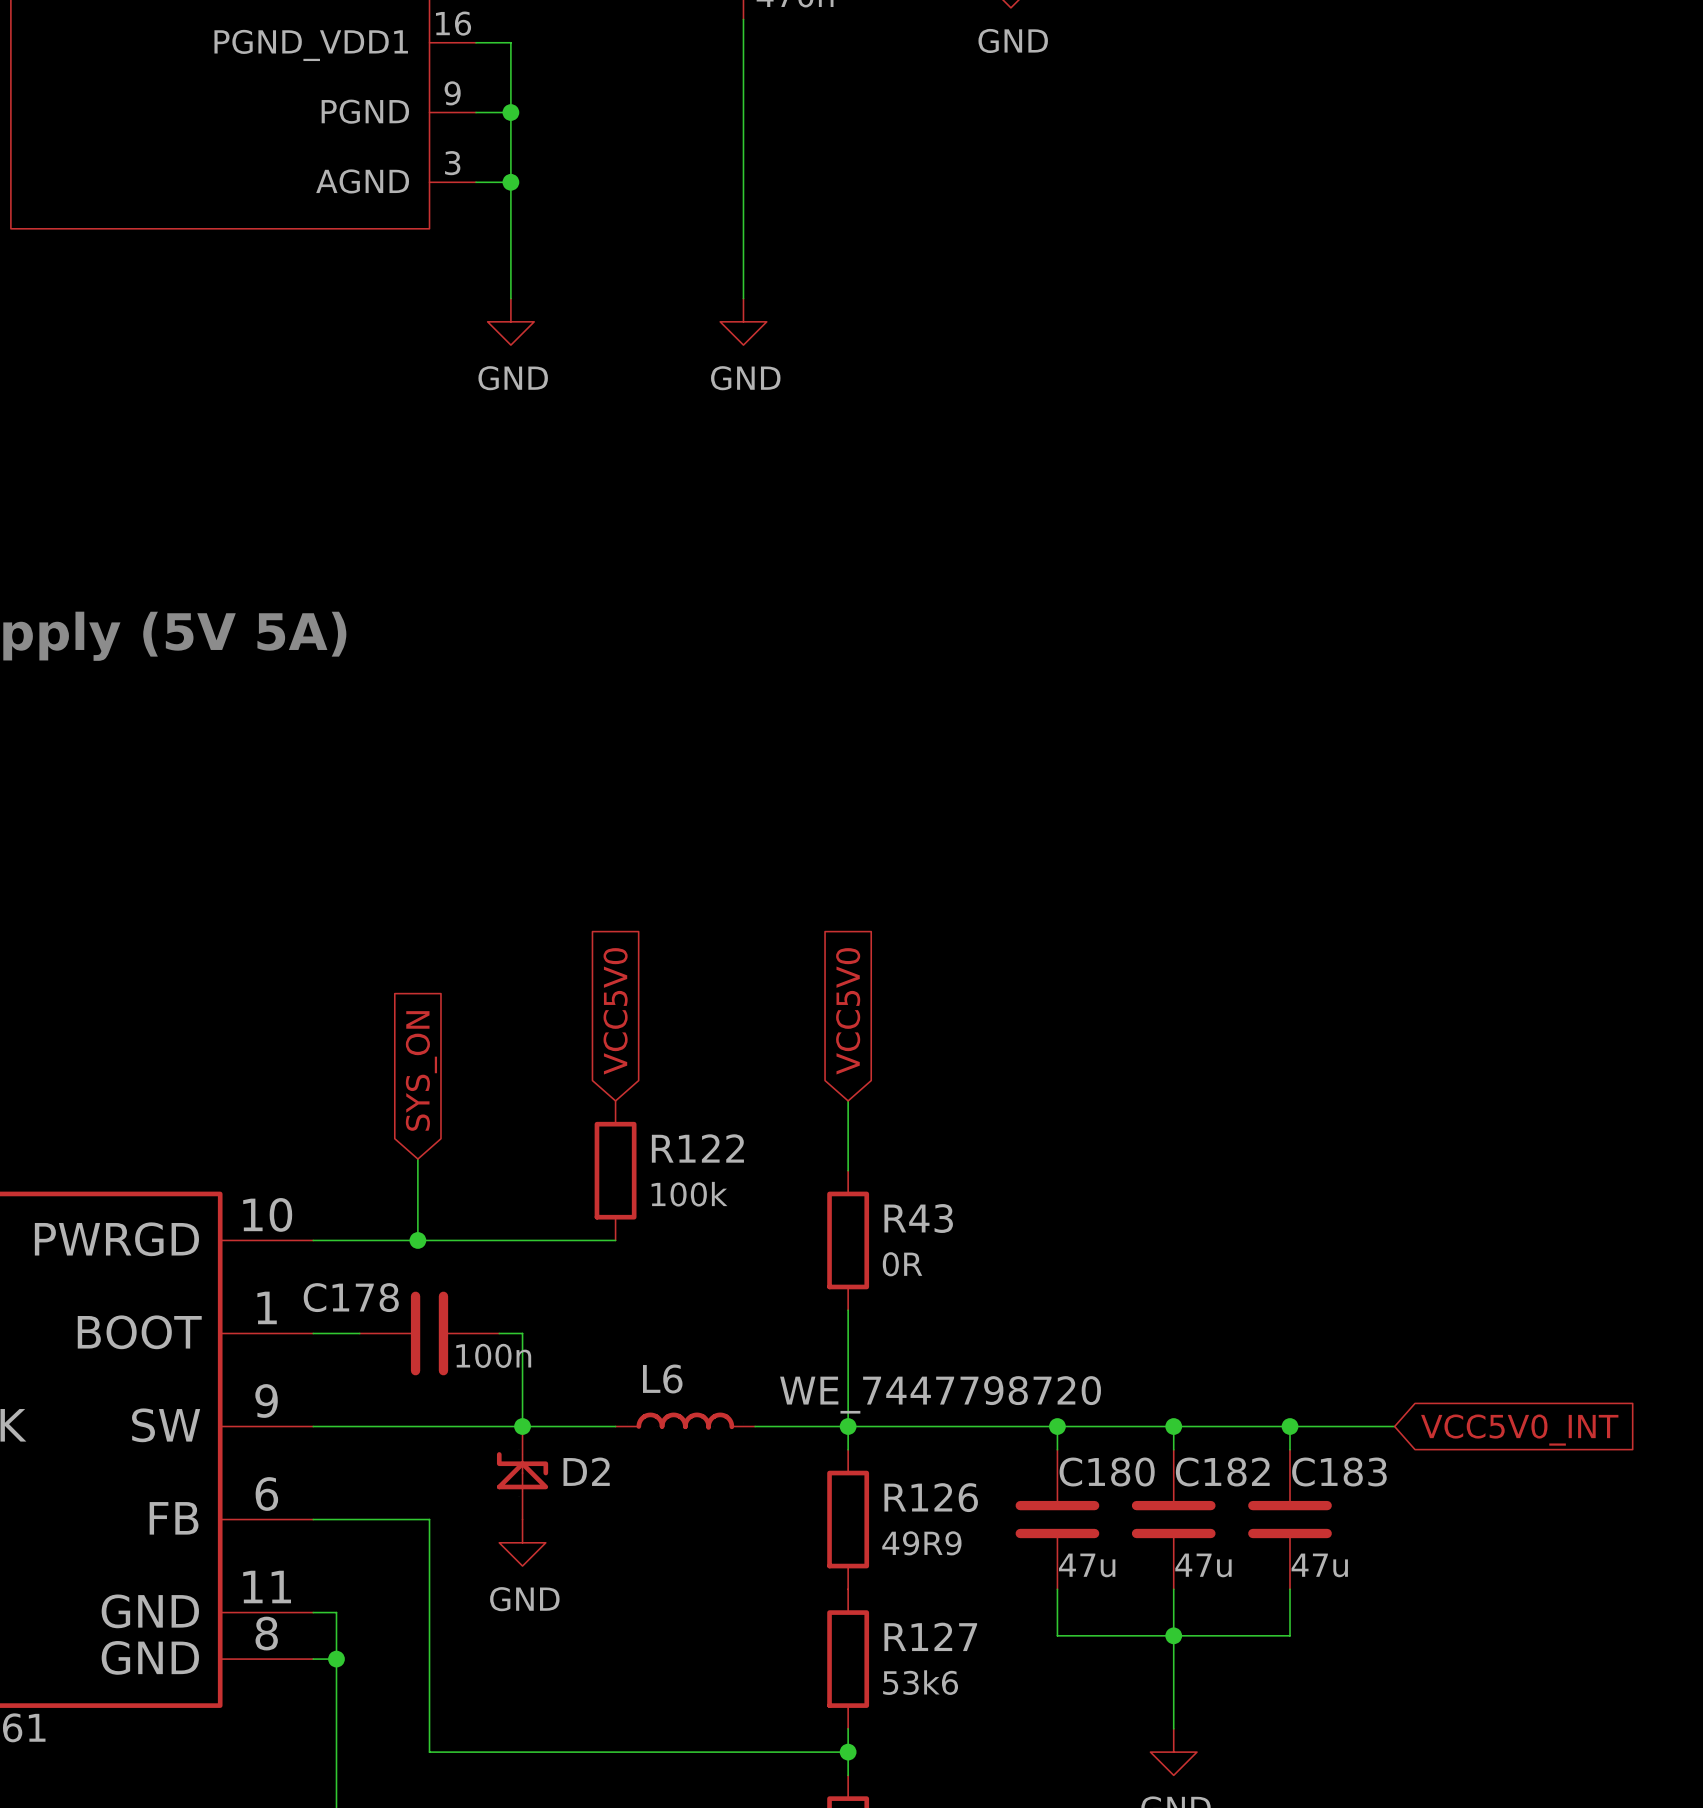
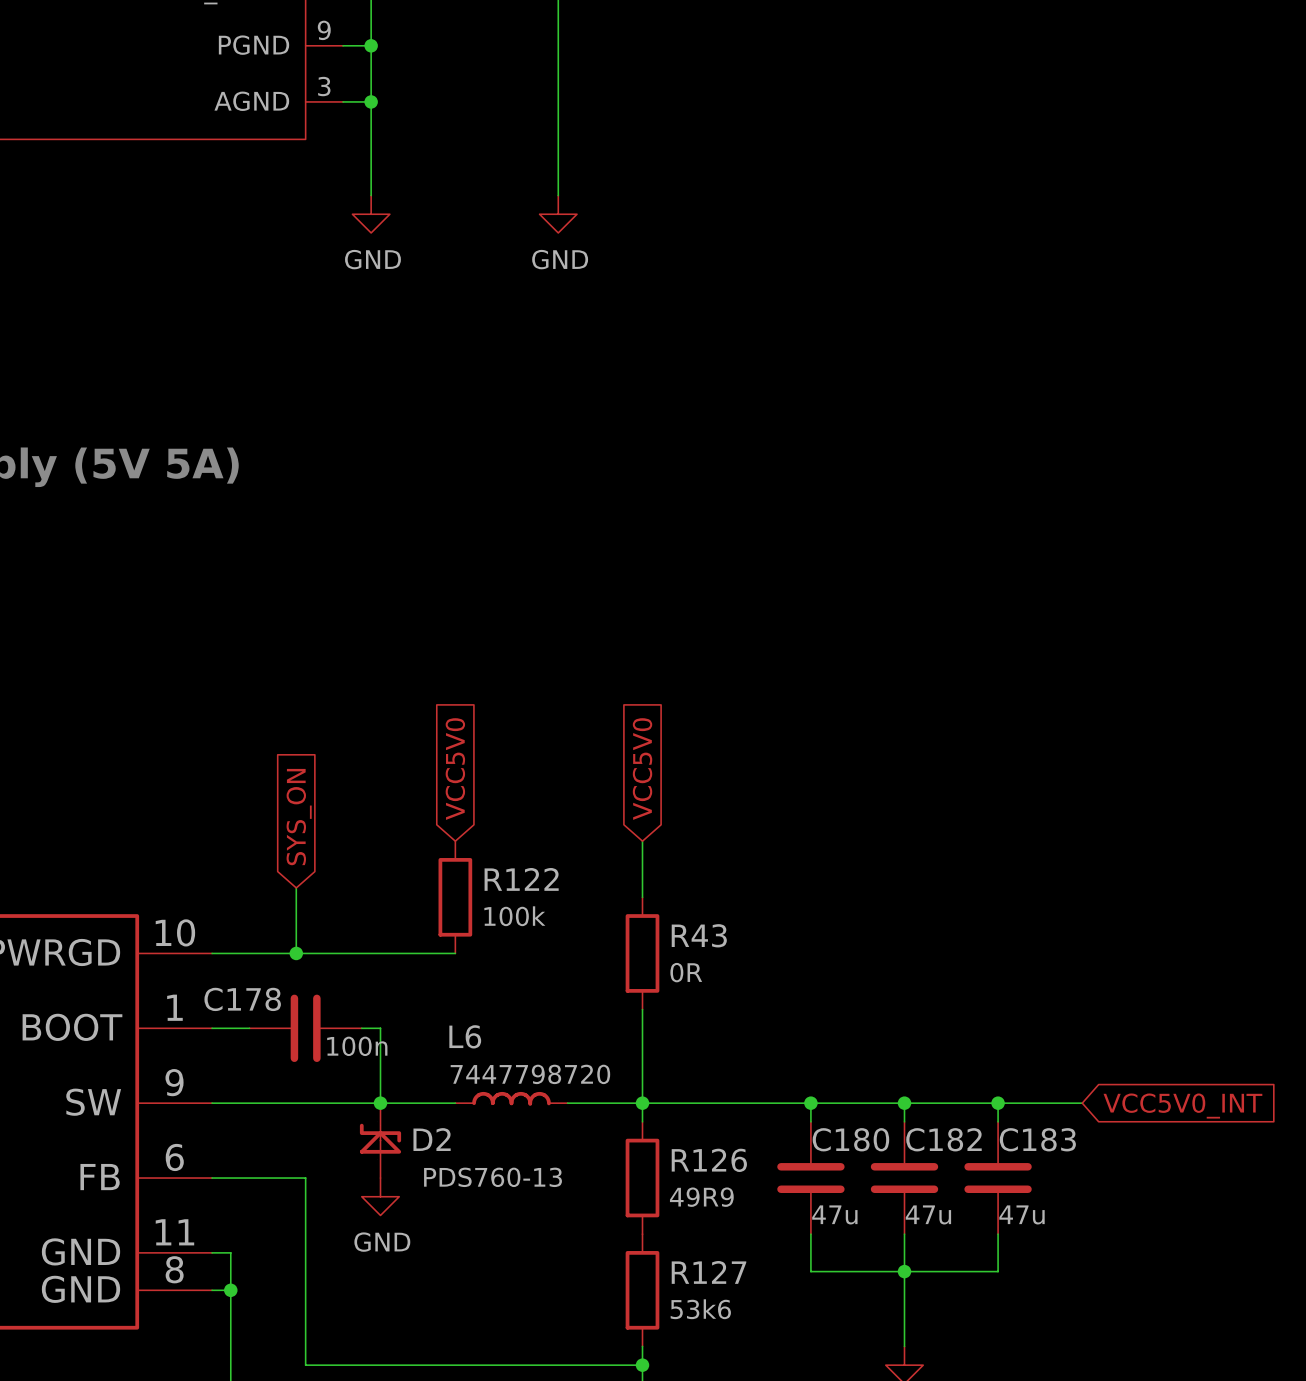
L6 name position: L6 (662, 1378) -> L6 (465, 1036)
L6 text: none -> 7447798720 (530, 1074)
L6 value: WE_7447798720 (940, 1394) -> none
D2 text: none -> PDS760-13 (493, 1177)

